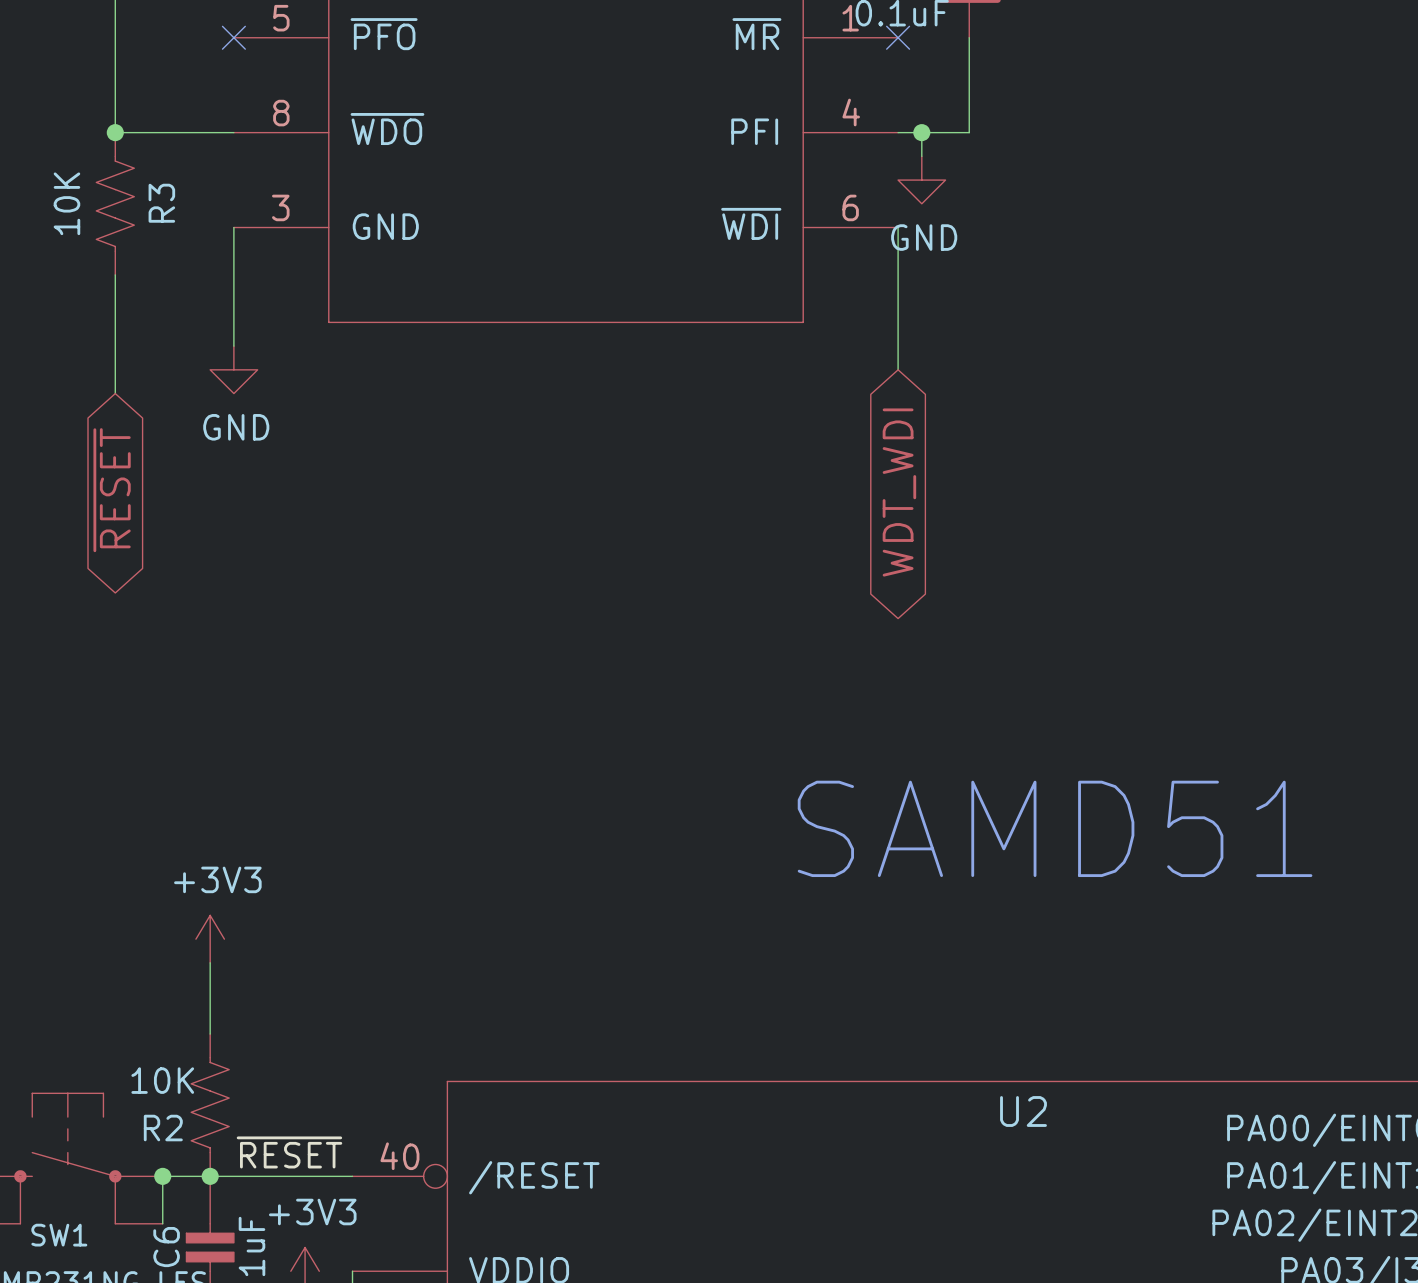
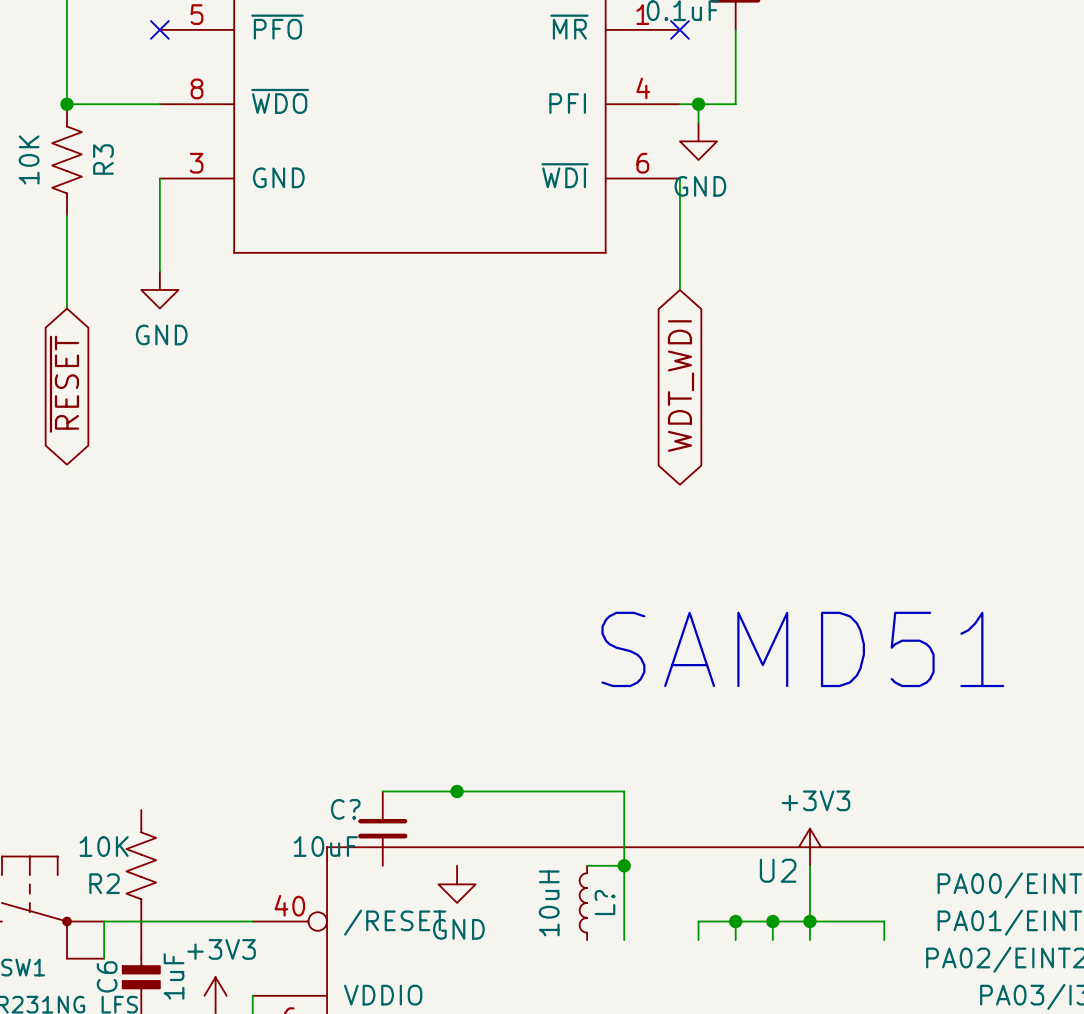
power symbol: +3V3 (210, 939) -> none
wire: (210, 962) (210, 1034) -> none
wire: none -> (382, 791) (624, 791) (624, 940)
junction: none -> (457, 791)
C?: none -> 10uF (382, 828)
power symbol: none -> +3V3 (809, 847)
wire: none -> (587, 865) (624, 865)
junction: none -> (624, 865)
wire: none -> (809, 865) (809, 940)
power symbol: none -> GND (457, 884)
label: ~{RESET} (289, 1152) -> none
L?: none -> 10uH (583, 902)
junction: (162, 1176) -> none
junction: (210, 1176) -> none
wire: none -> (735, 921) (735, 940)
junction: none -> (735, 921)
wire: none -> (772, 921) (772, 940)
junction: none -> (772, 921)
junction: none -> (809, 921)
wire: none -> (698, 940) (698, 921) (884, 921) (884, 940)

